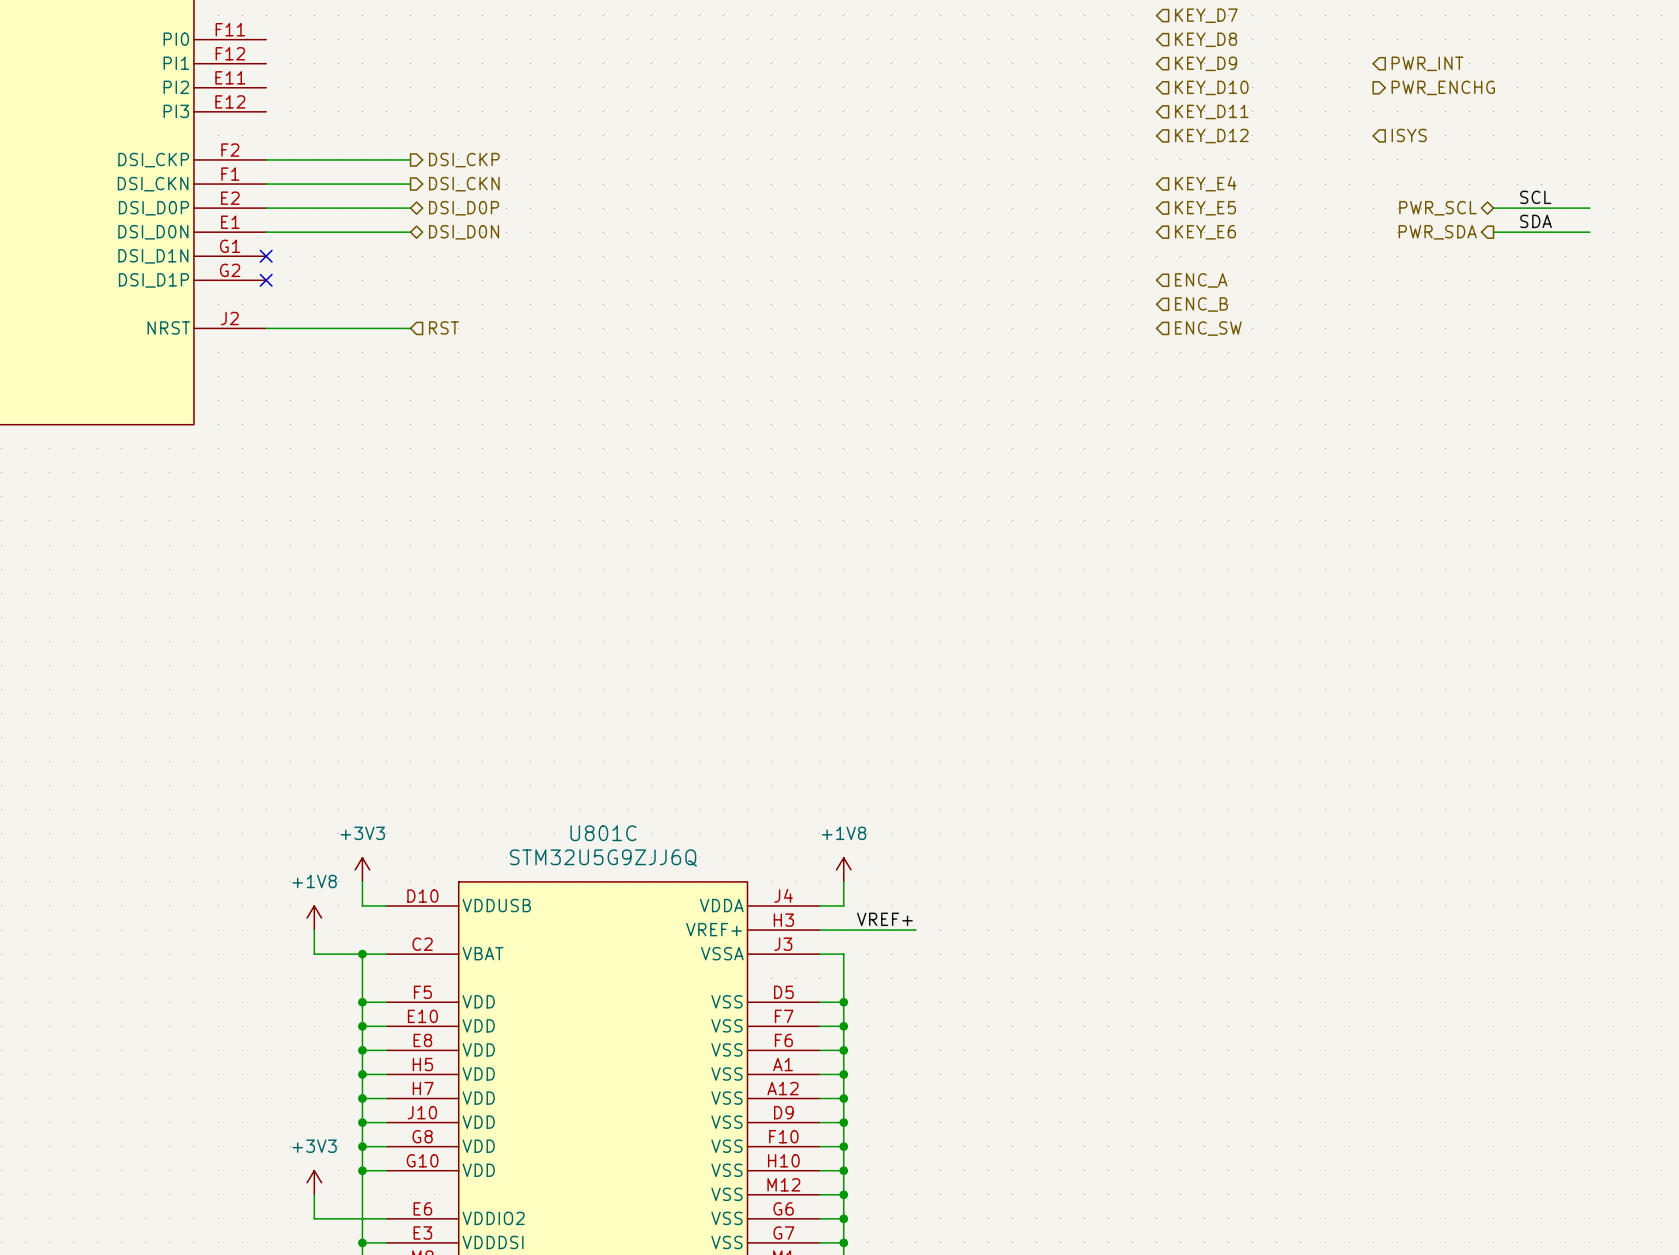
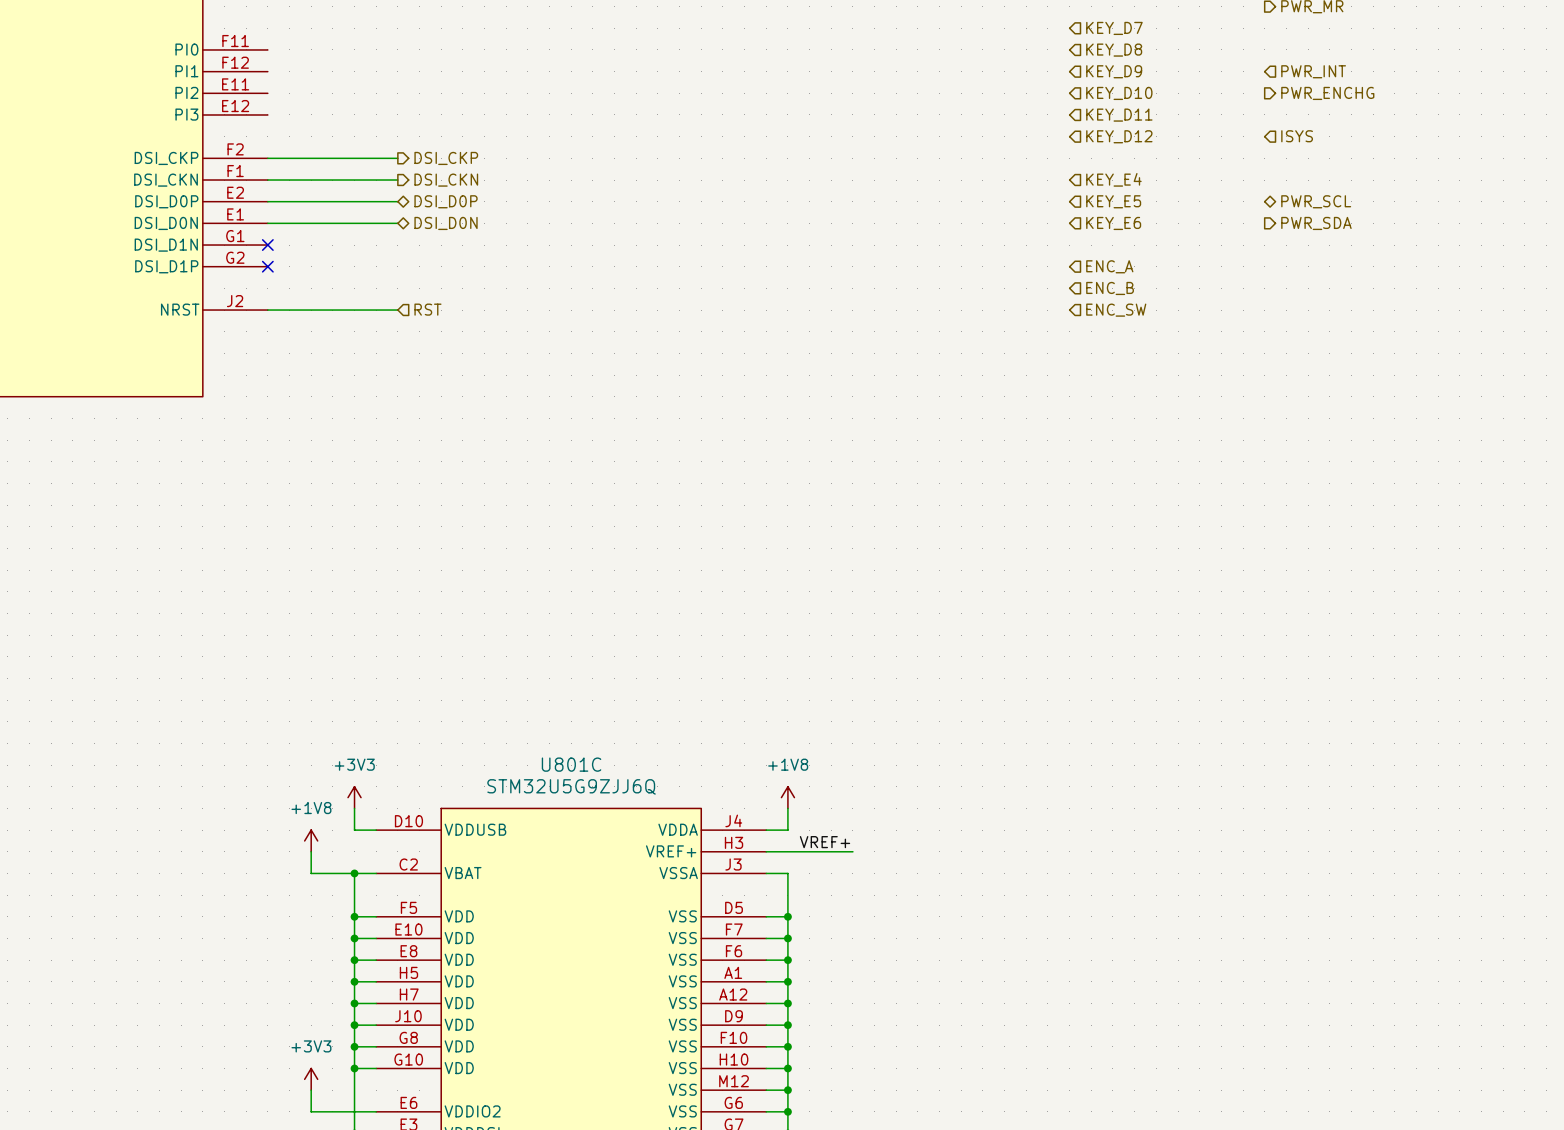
label: SCL (1535, 197) -> none
hierarchical label rotation: 0° (1438, 208) -> 180° (1316, 201)
wire: (1493, 208) (1589, 208) -> none
label: SDA (1536, 221) -> none
hierarchical label rotation: 0° (1437, 232) -> 180° (1316, 223)
wire: (1493, 232) (1589, 232) -> none

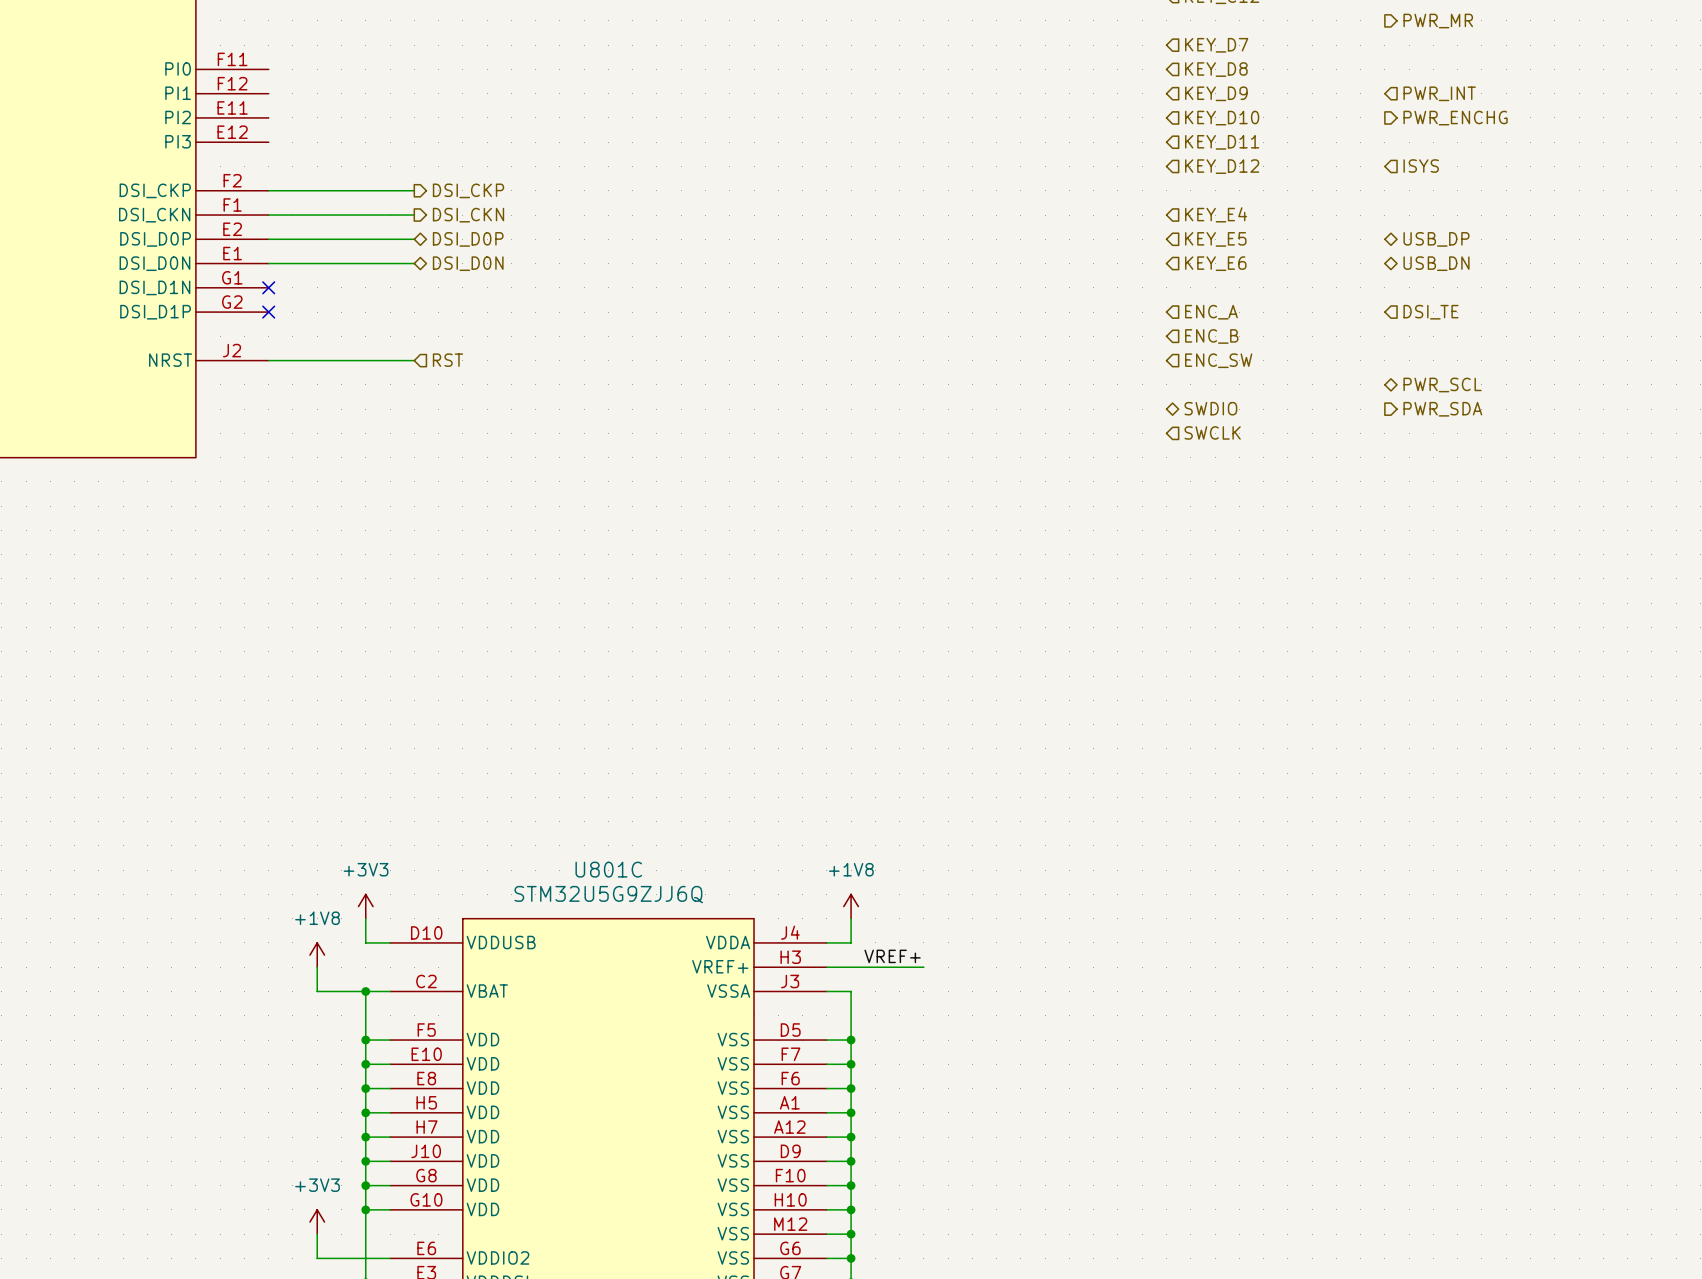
hierarchical label: PWR_SCL (1316, 201) -> USB_DP (1436, 239)
hierarchical label shape: output (1316, 223) -> bidirectional (1436, 263)
hierarchical label: PWR_SDA (1316, 223) -> USB_DN (1436, 263)
hierarchical label: none -> DSI_TE (1431, 312)
hierarchical label: none -> PWR_SCL (1442, 384)
hierarchical label: none -> SWDIO (1210, 408)
hierarchical label: none -> PWR_SDA (1442, 409)
hierarchical label: none -> SWCLK (1212, 432)

